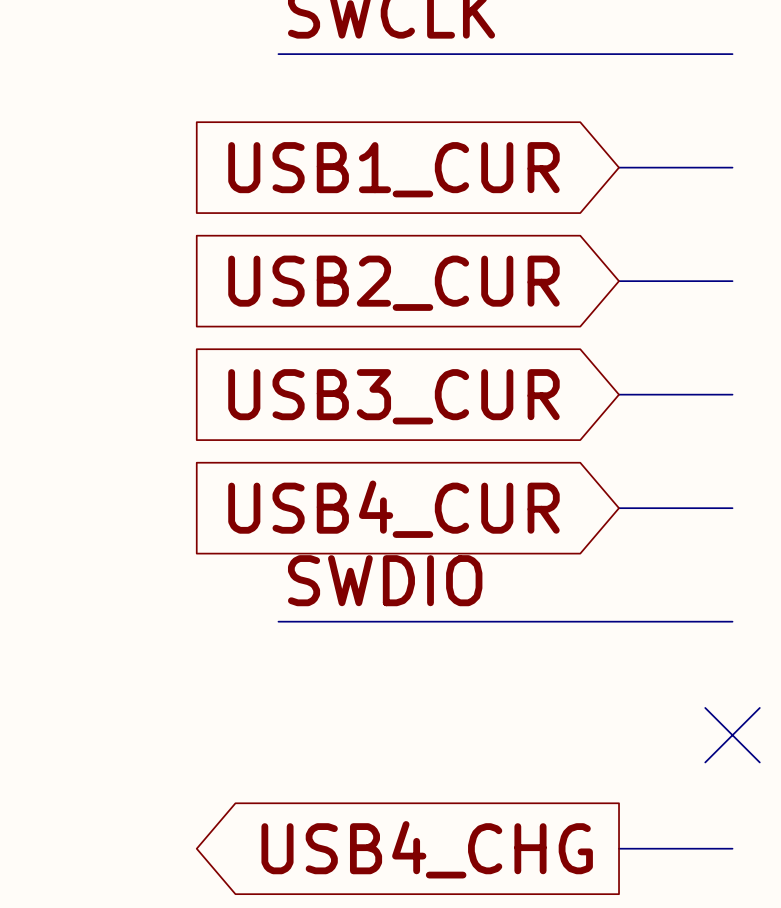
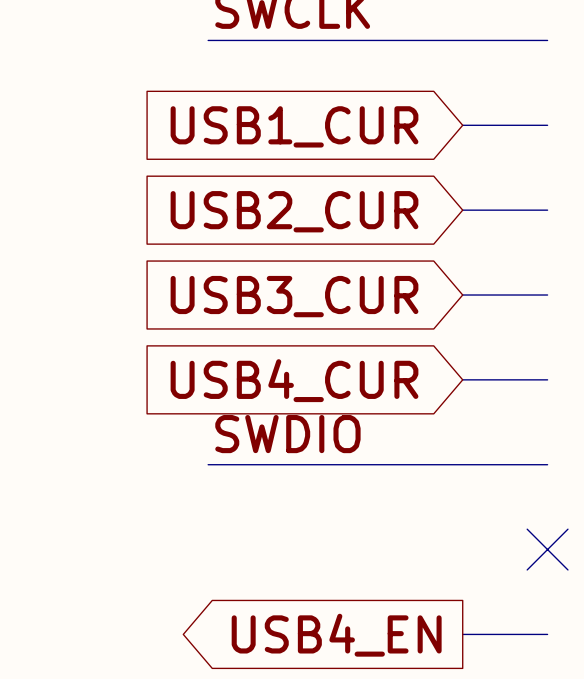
global label: USB4_CHG (427, 849) -> USB4_EN (336, 635)

